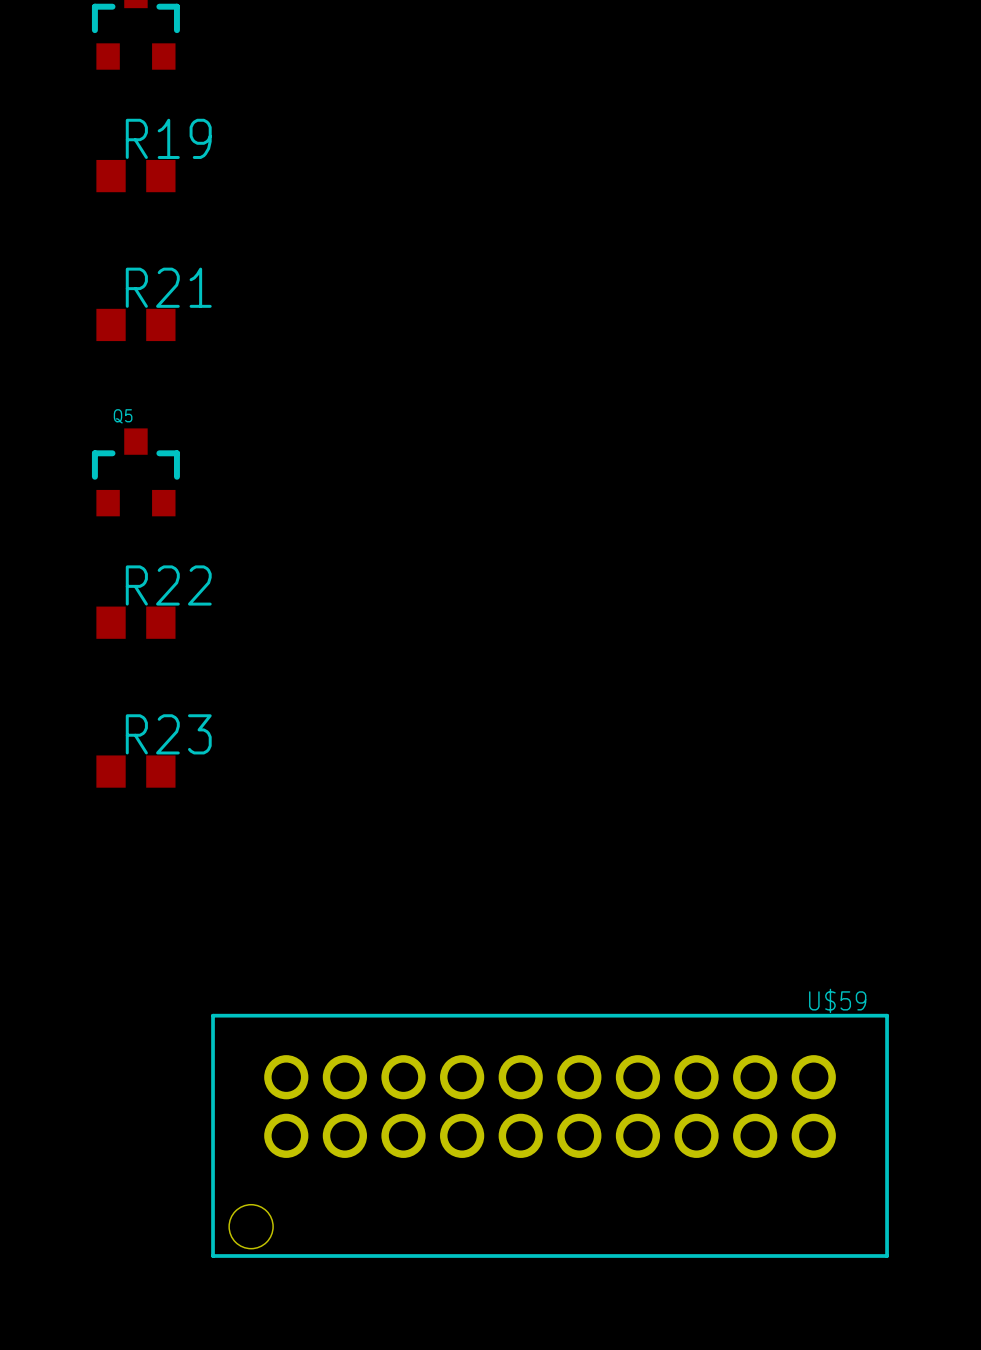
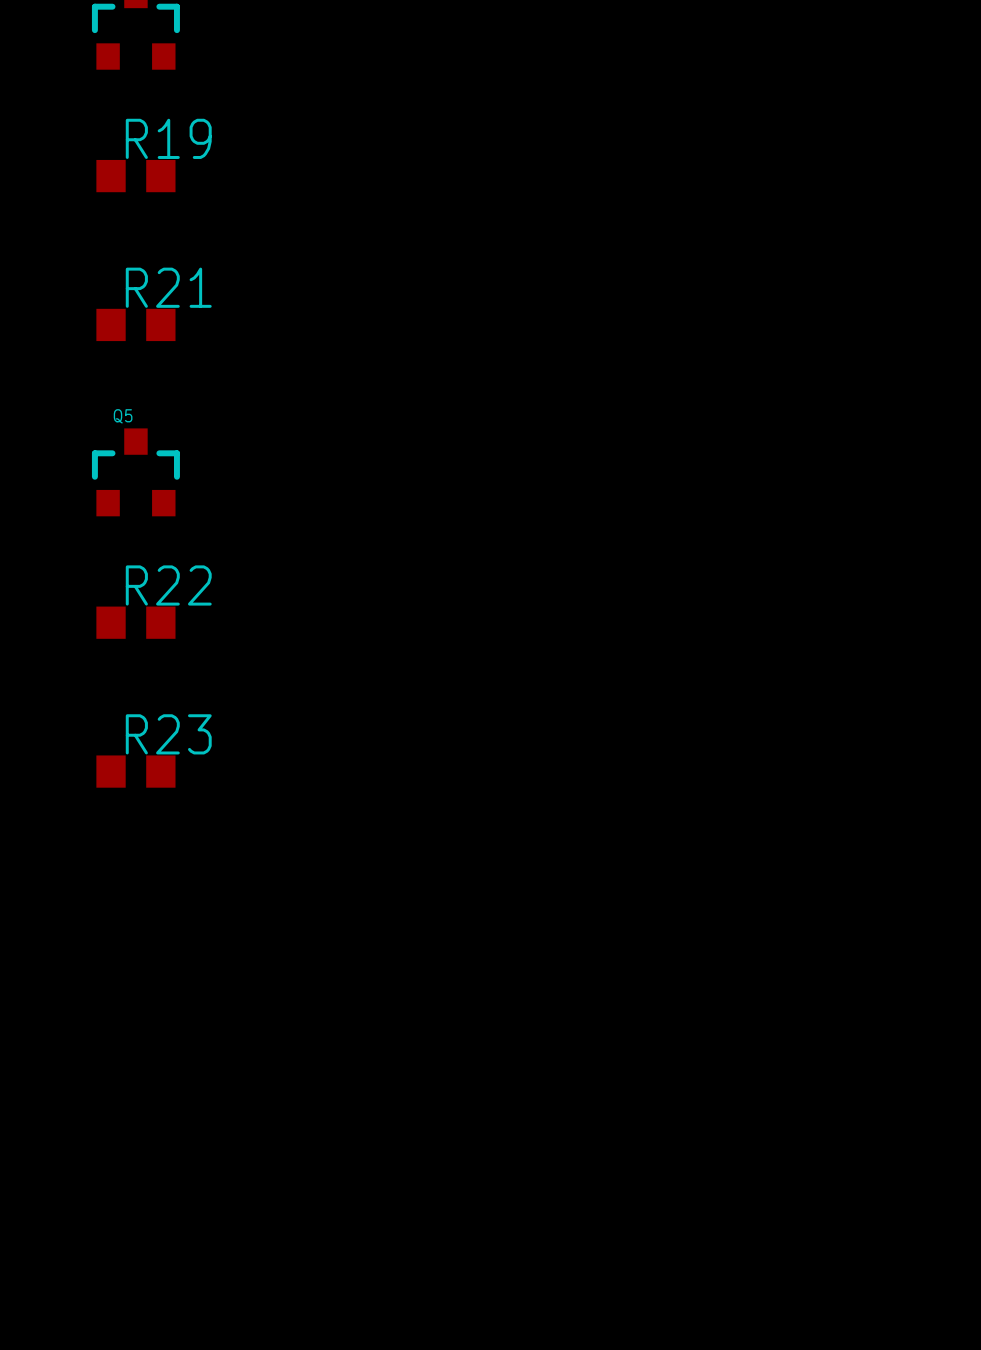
U$59: (550, 1135) -> none

